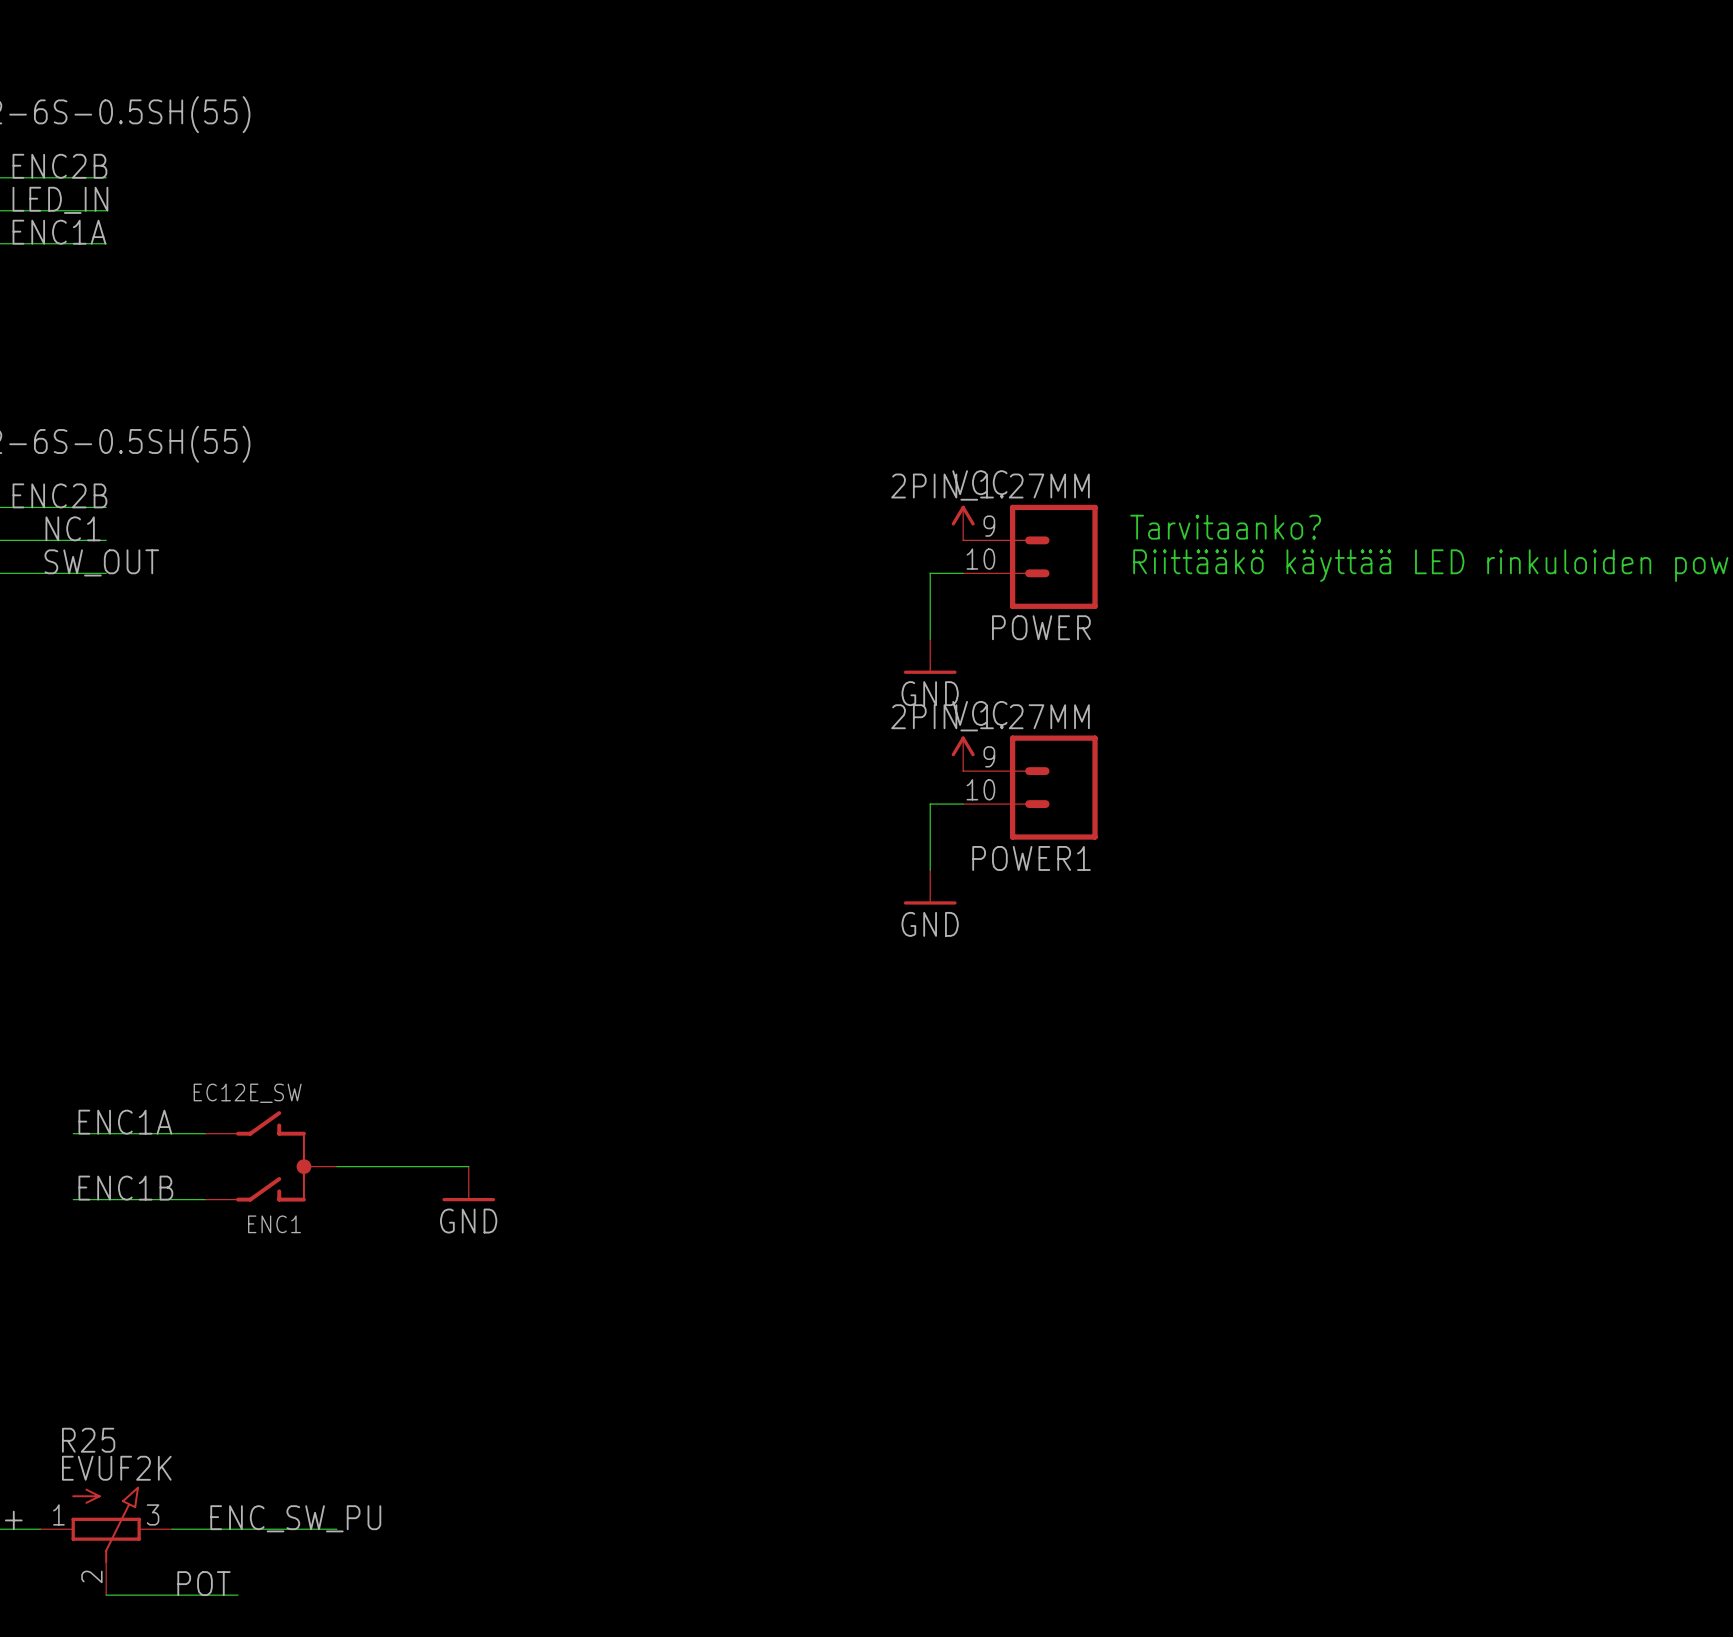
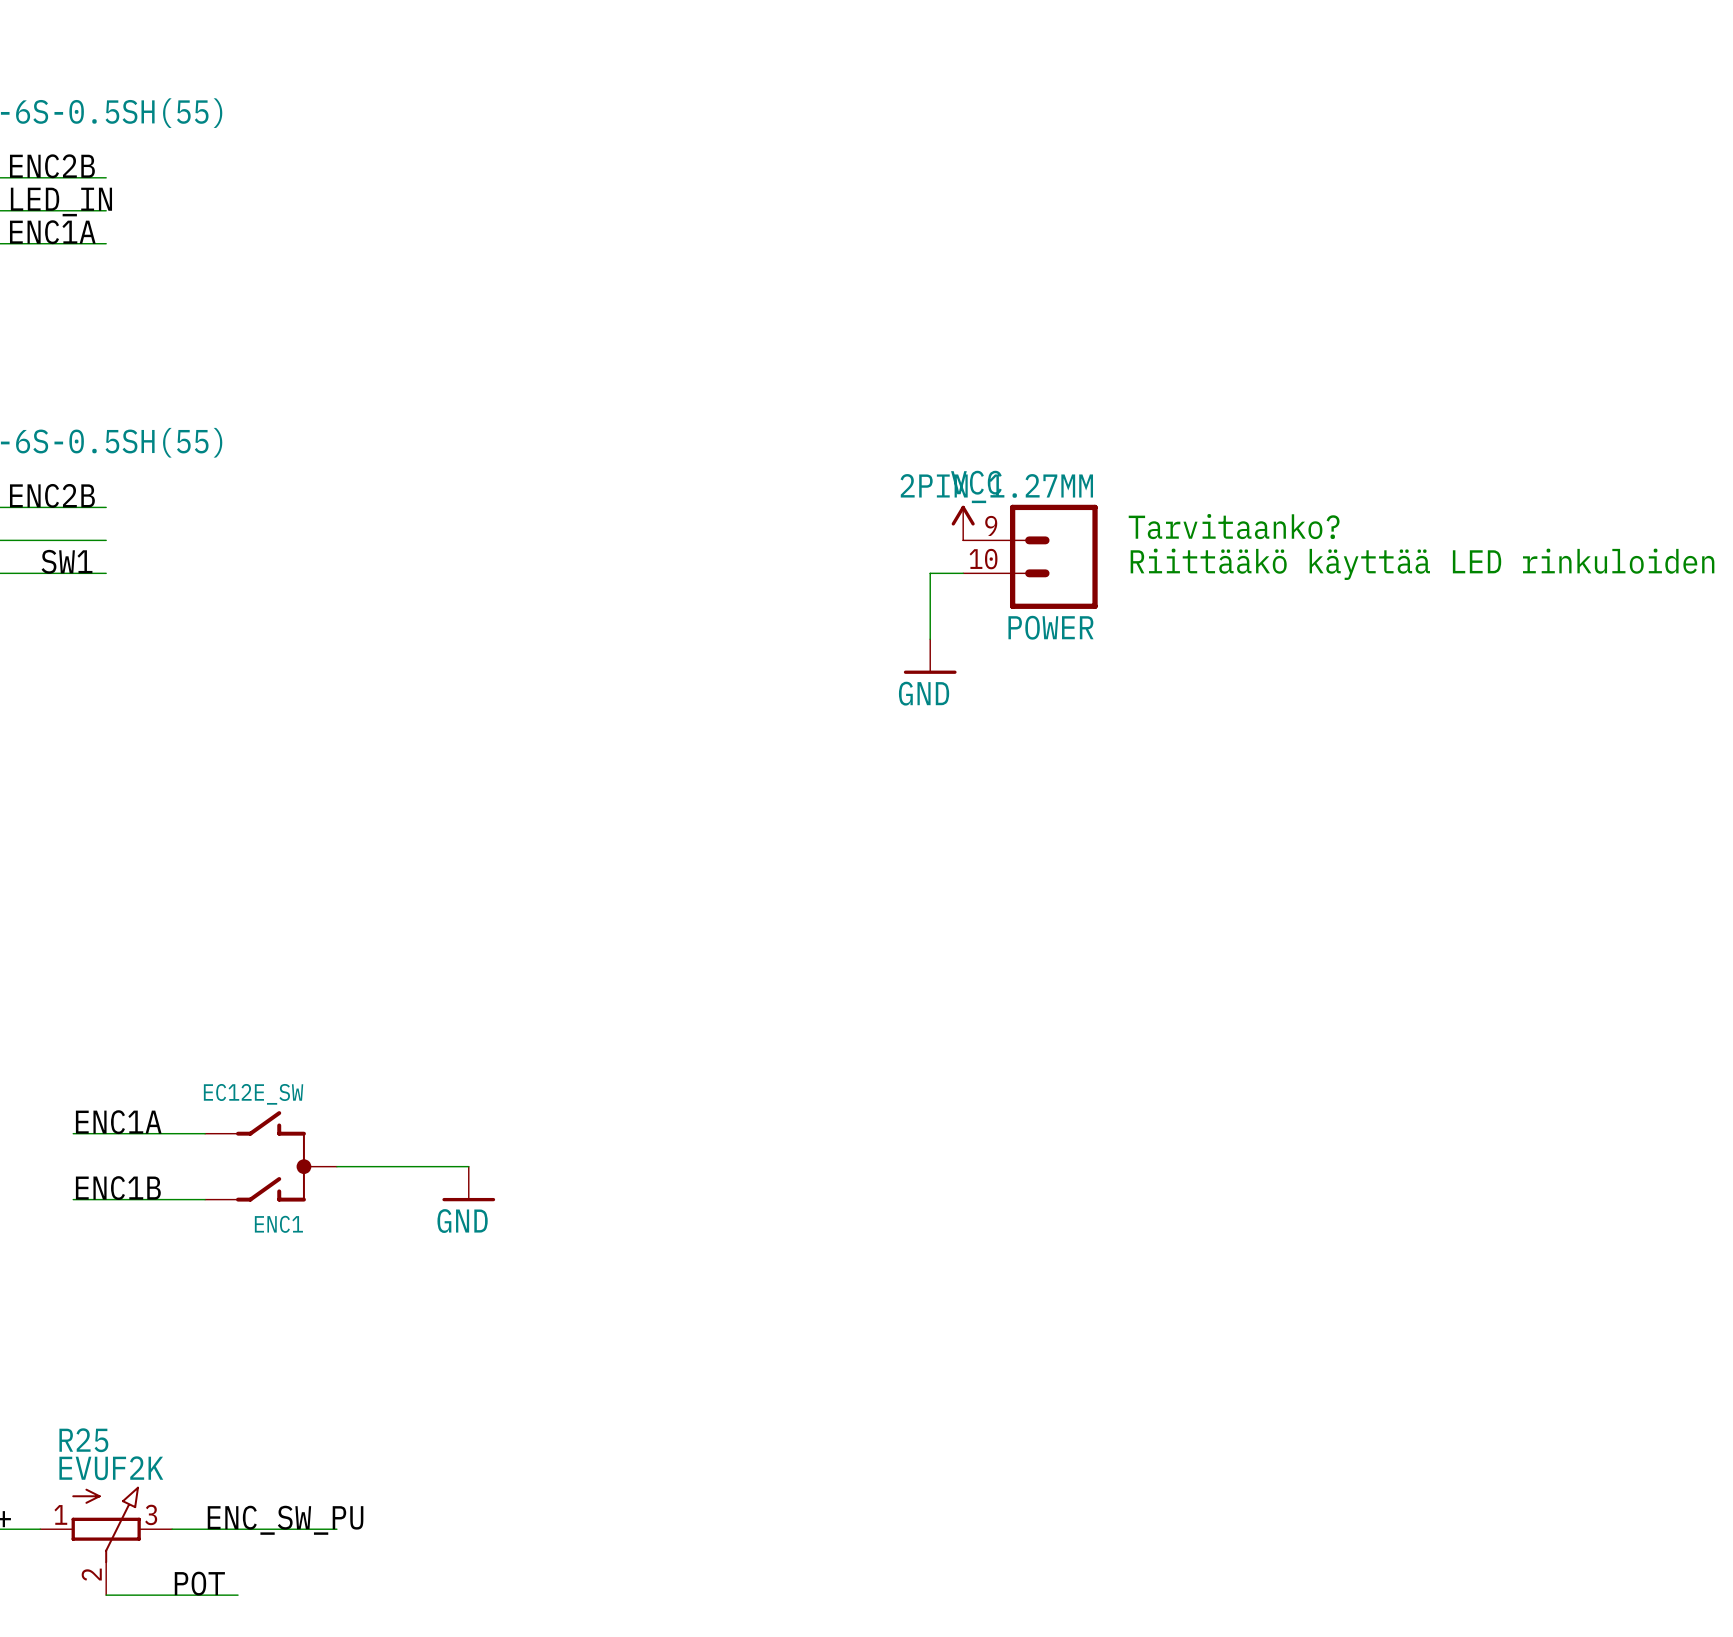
label: NC1 (73, 528) -> none
label: SW_OUT (101, 562) -> SW1 (67, 561)
power symbol: VCC (963, 753) -> none
POWER1: 2PIN_1.27MM (1030, 787) -> none
wire: (963, 804) (930, 804) (930, 869) -> none
power symbol: GND (930, 887) -> none

